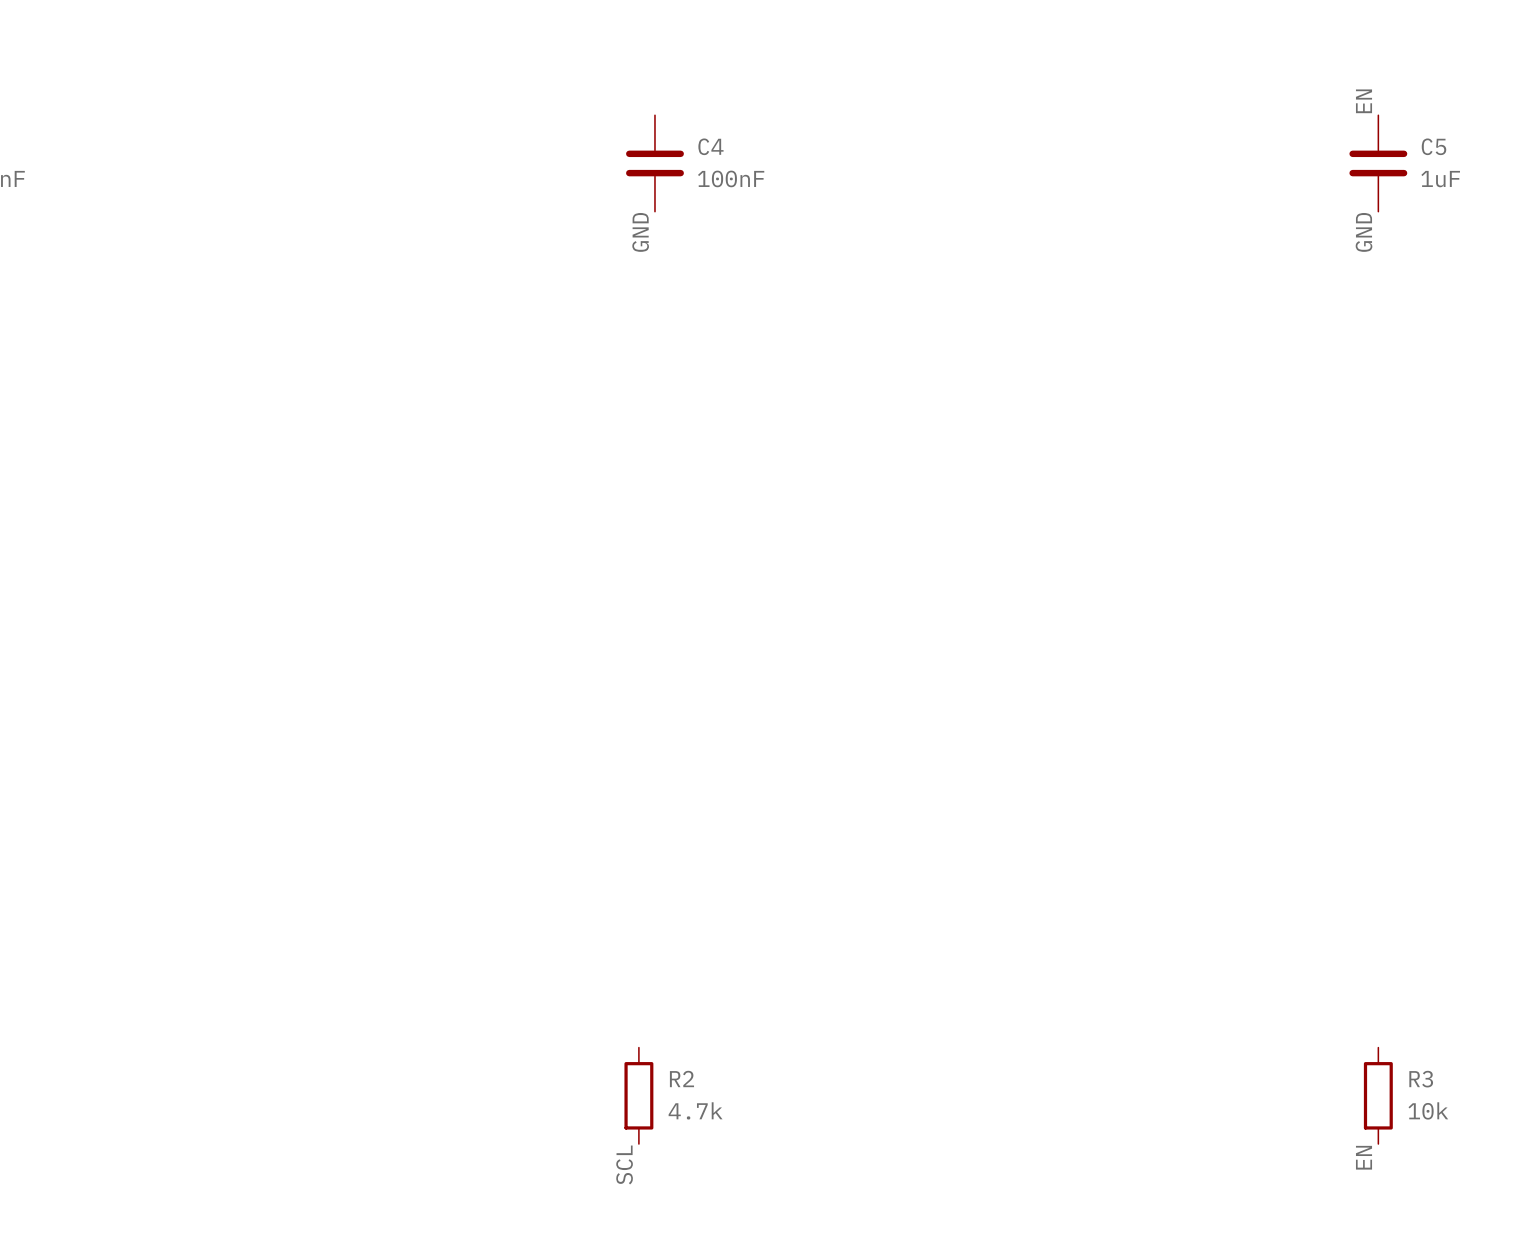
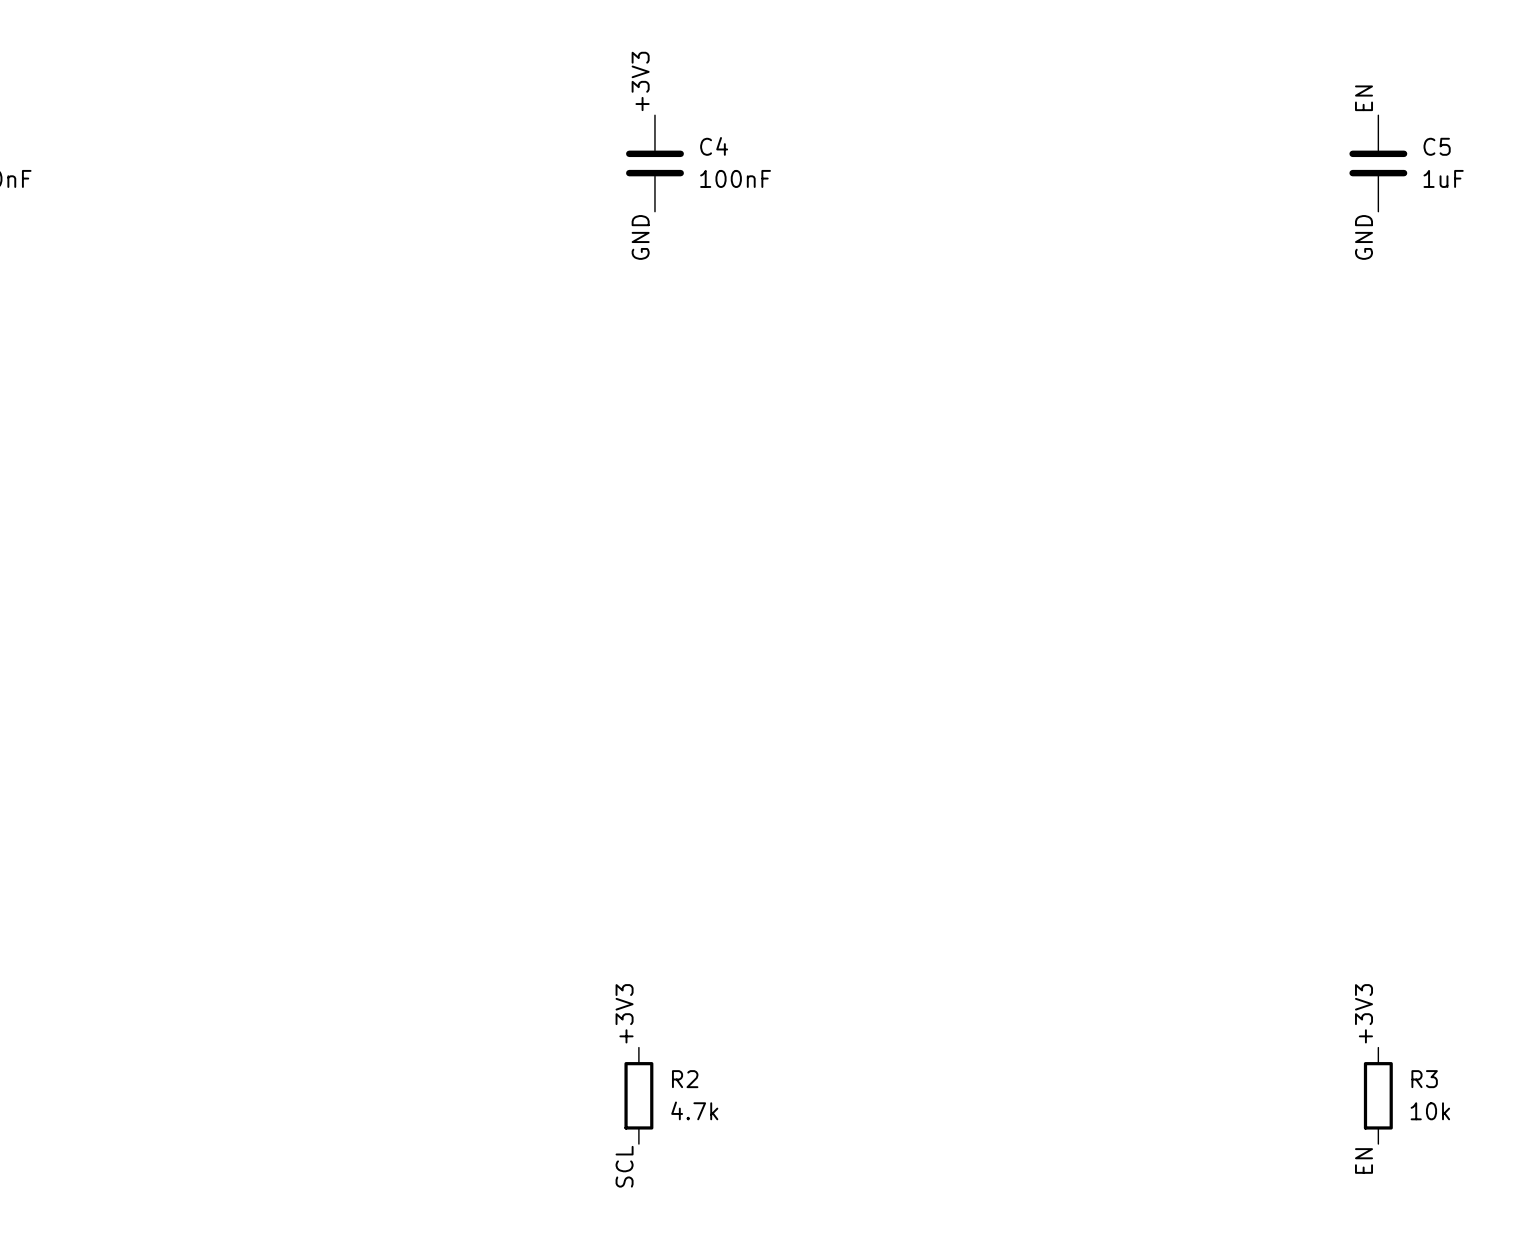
label: none -> +3V3 (640, 81)
label: none -> +3V3 (624, 1013)
label: none -> +3V3 (1364, 1013)

